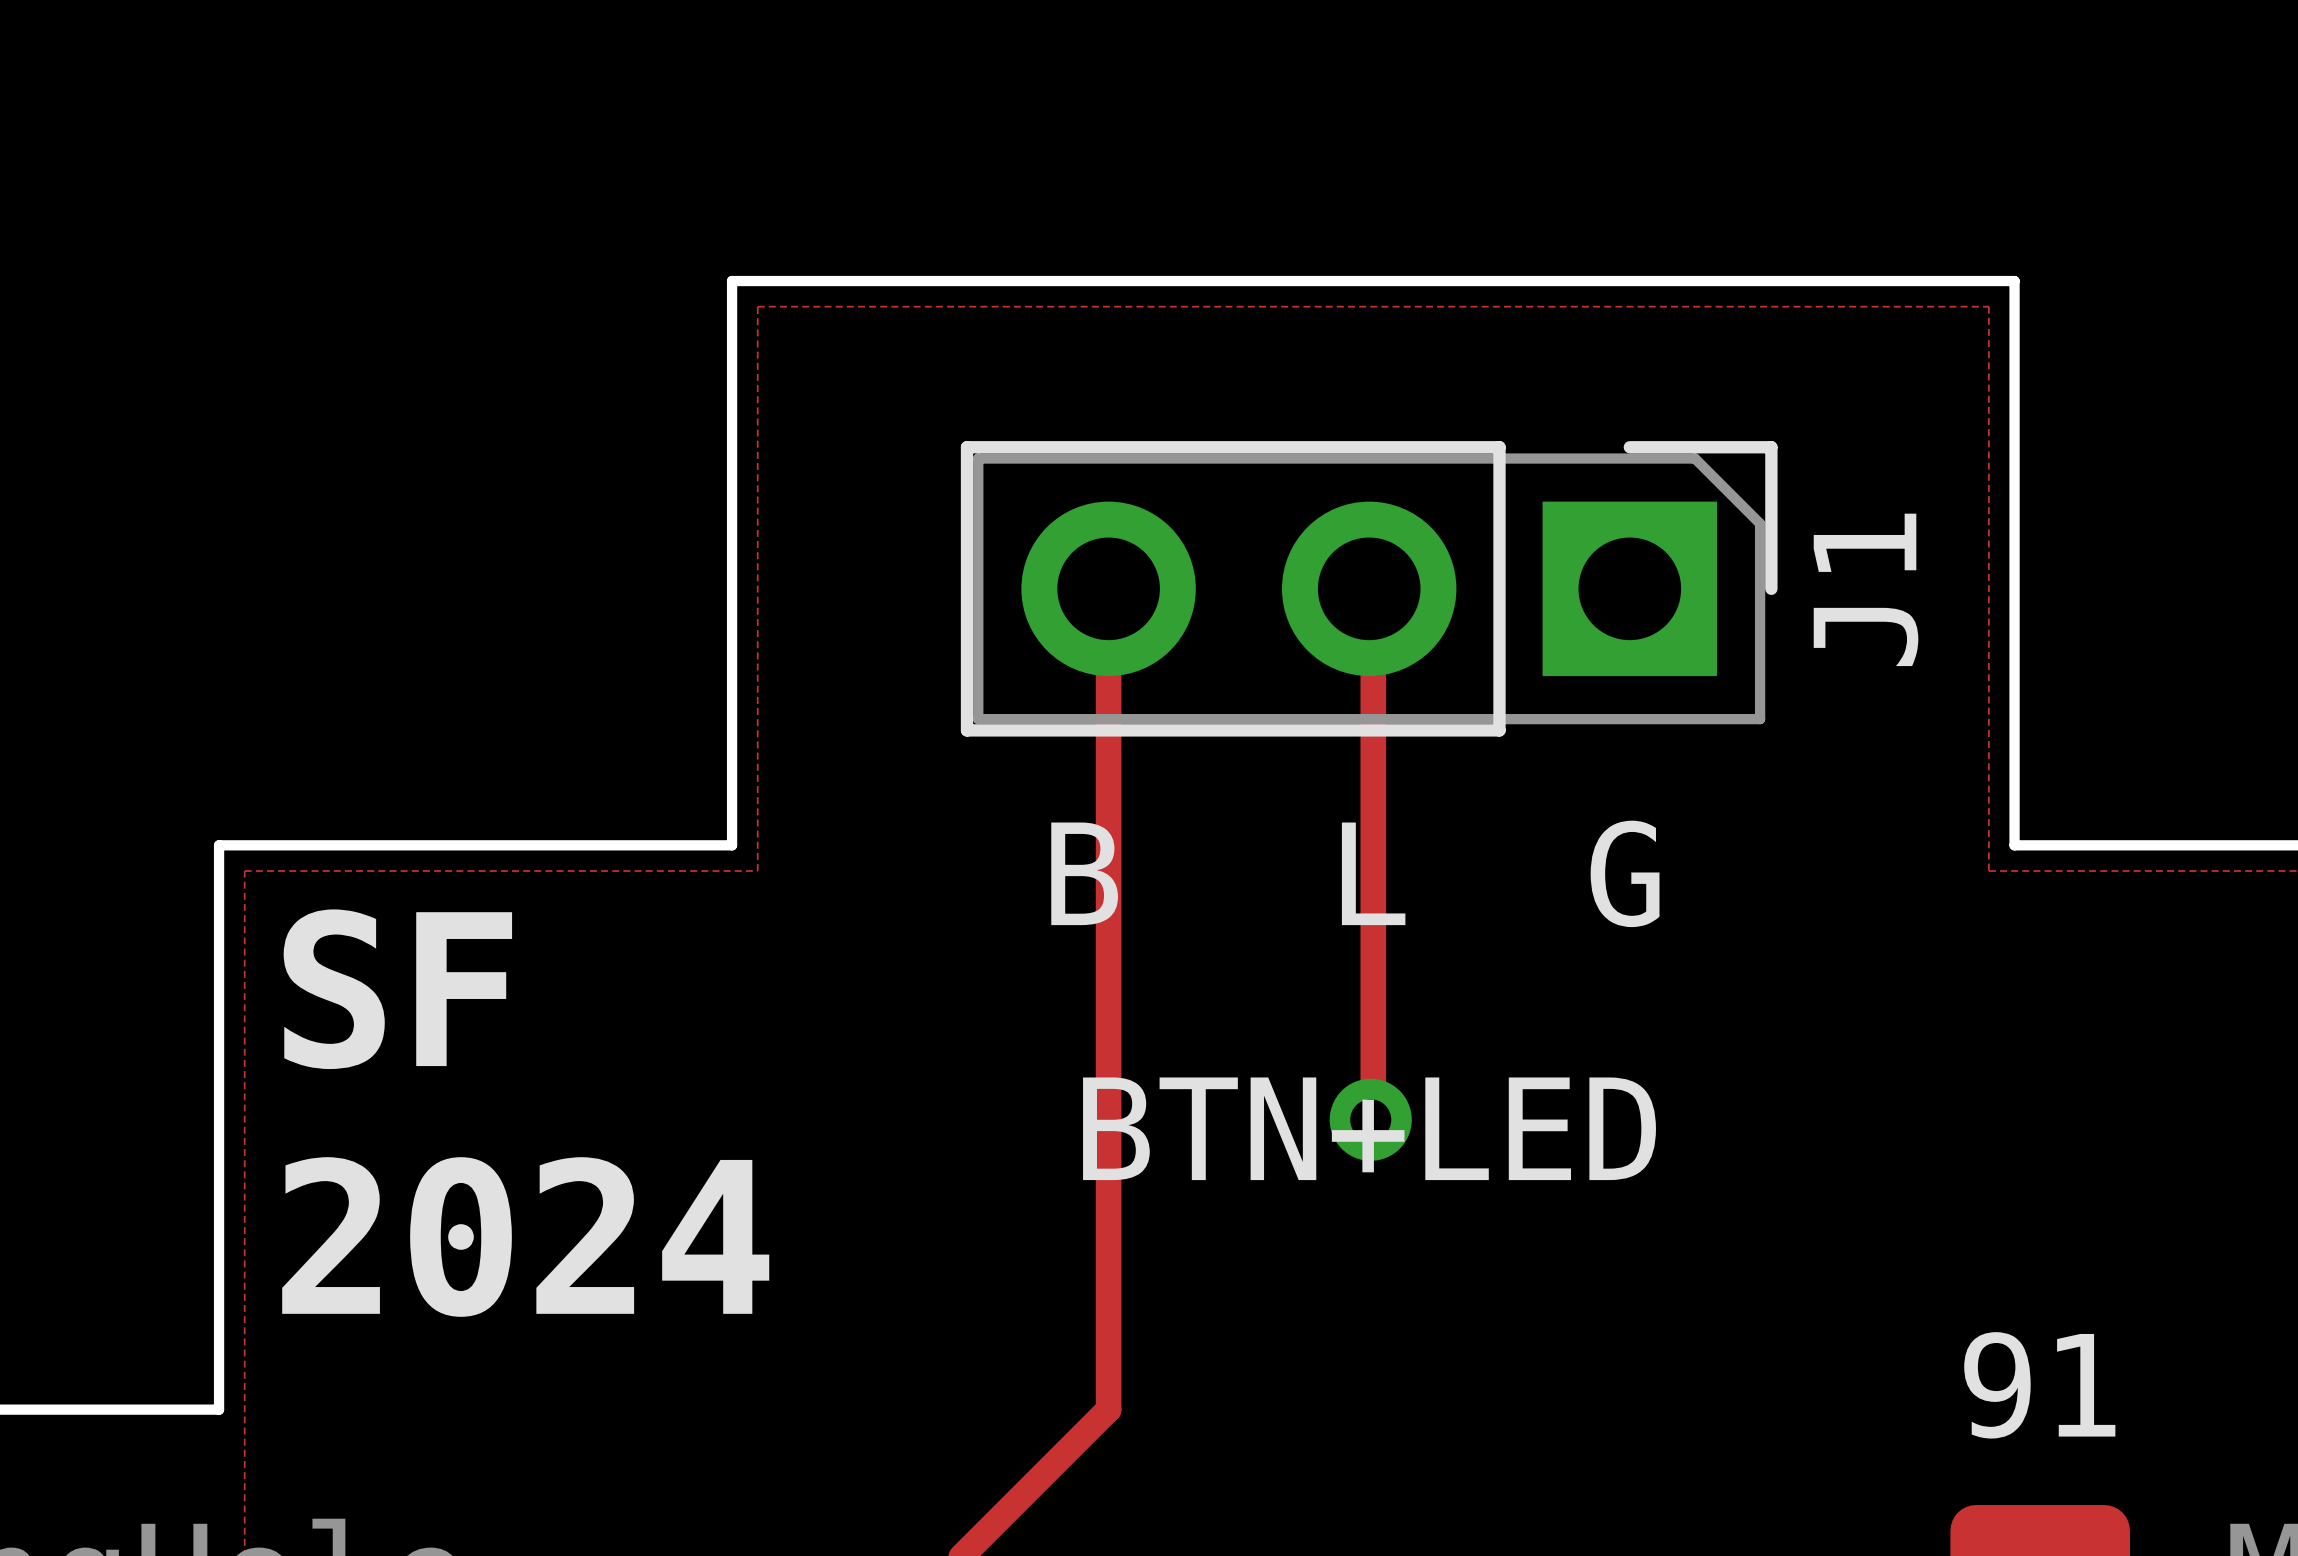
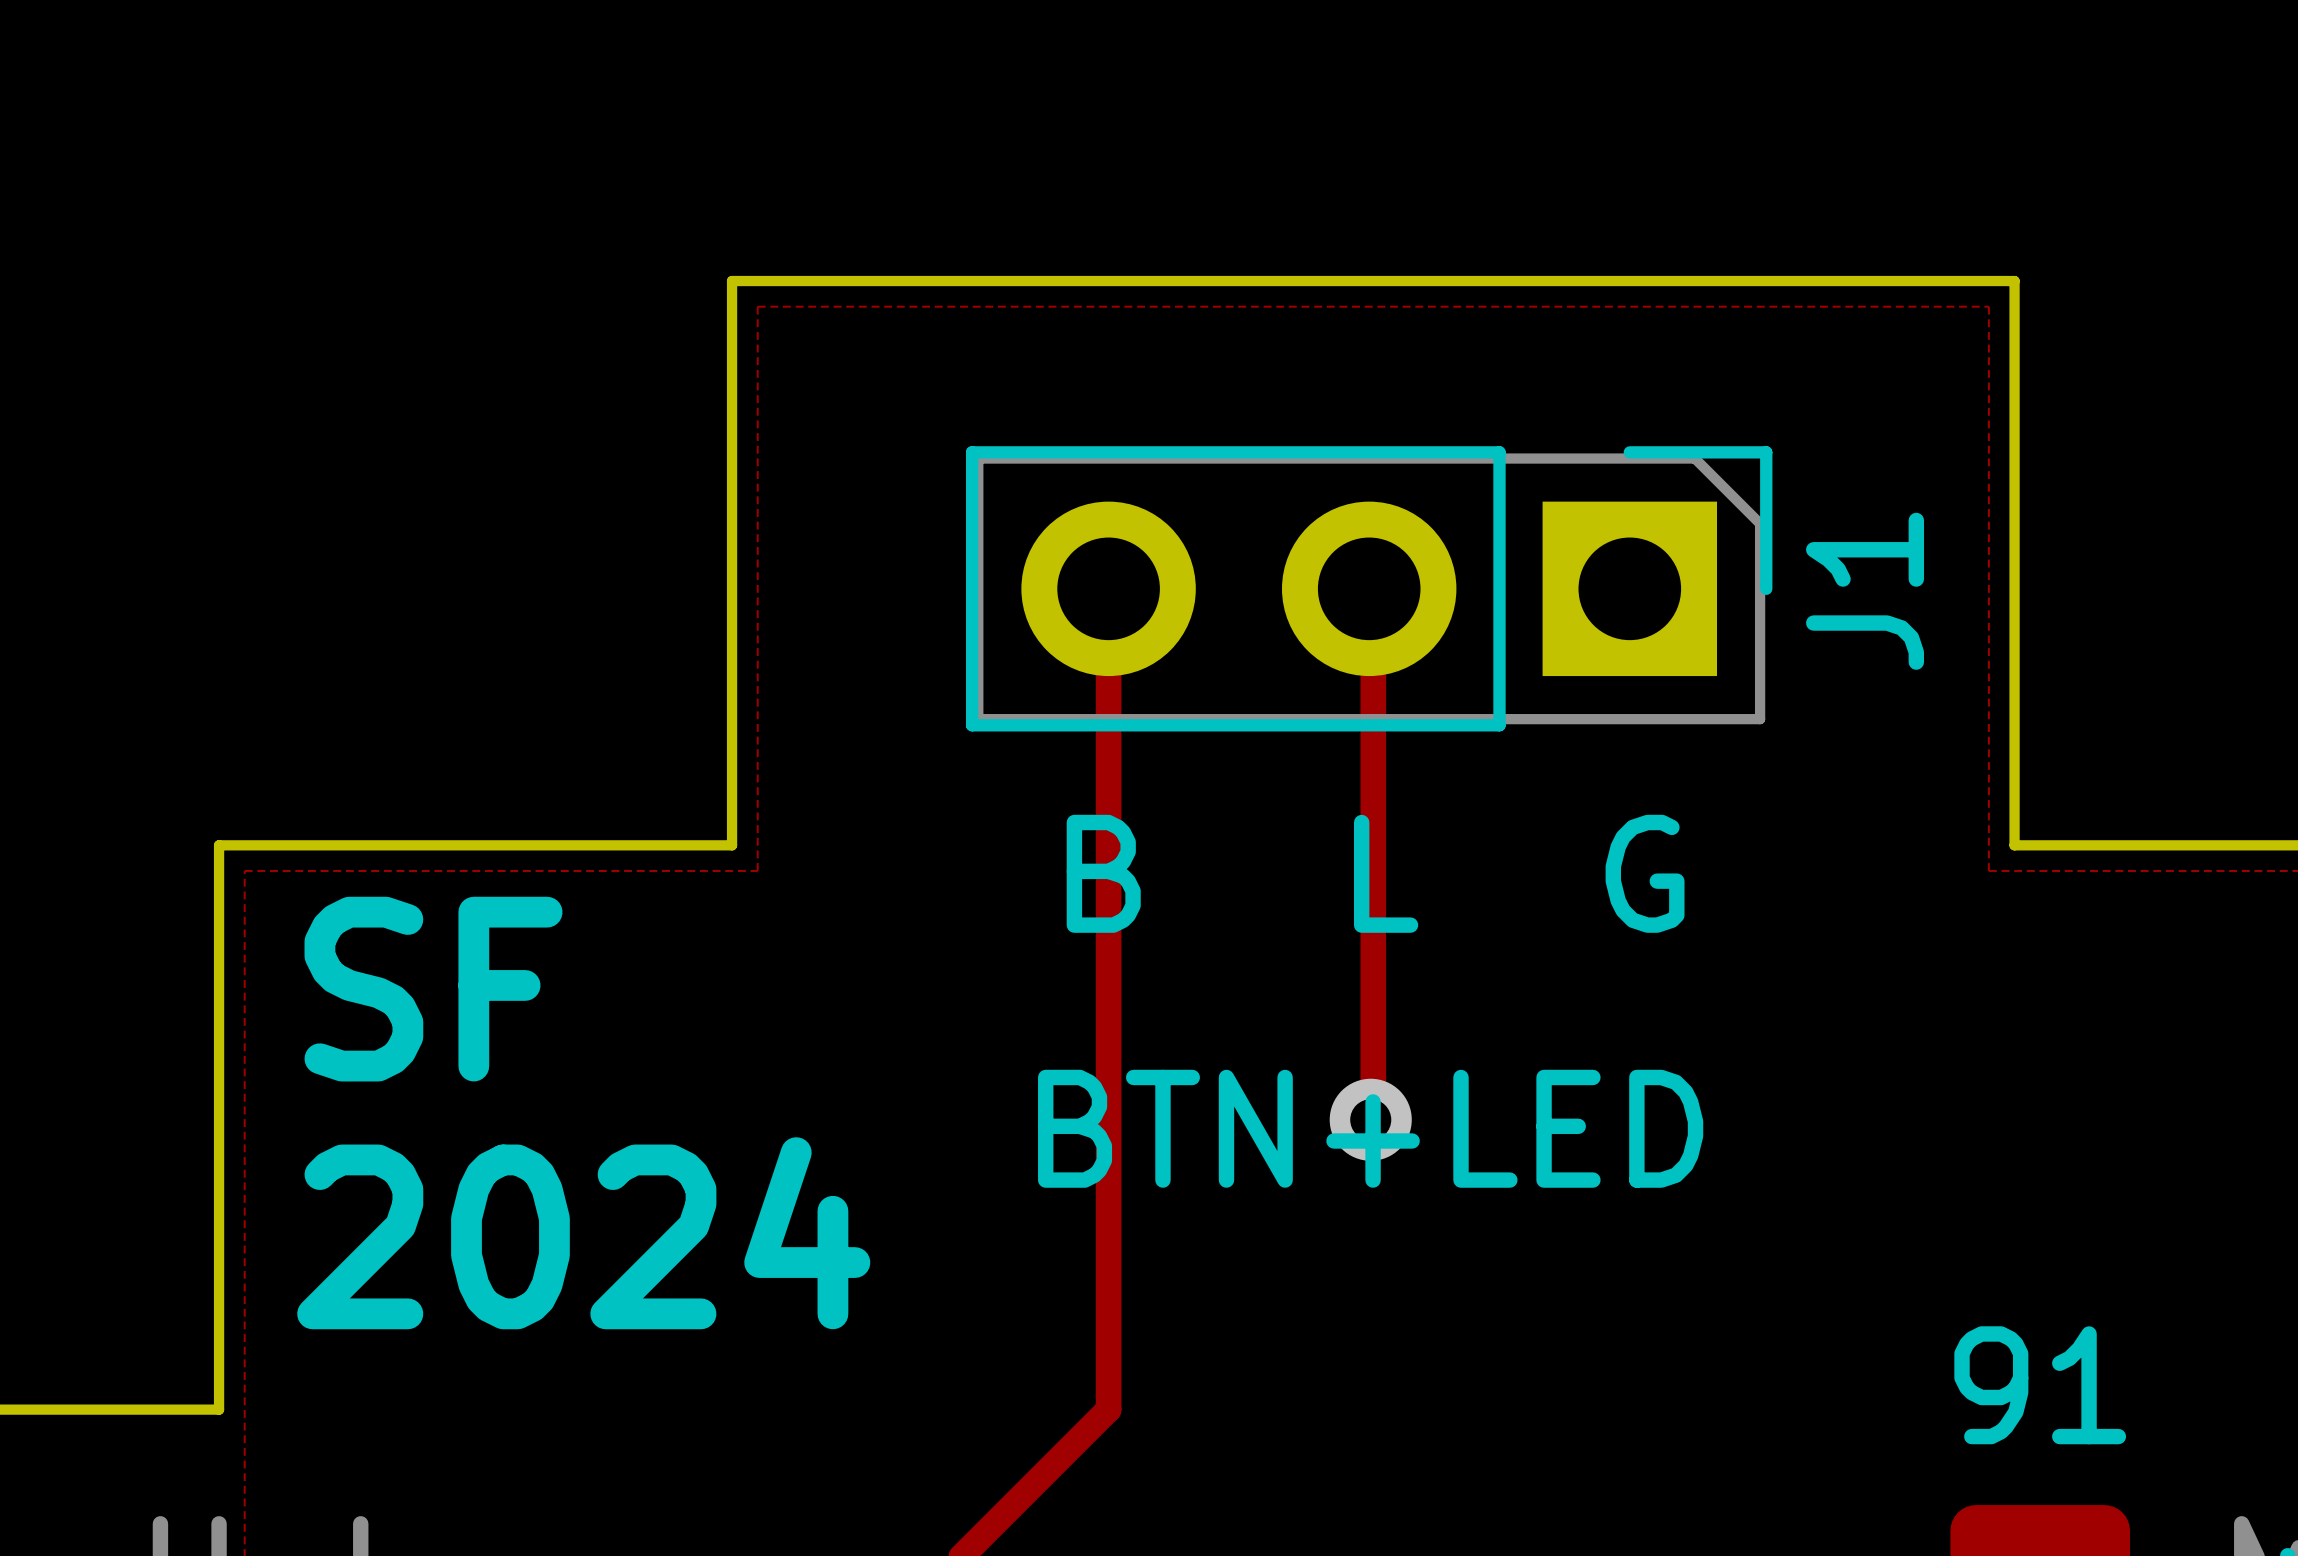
J1 footprint: [960, 441, 1778, 737] -> [965, 446, 1773, 732]

